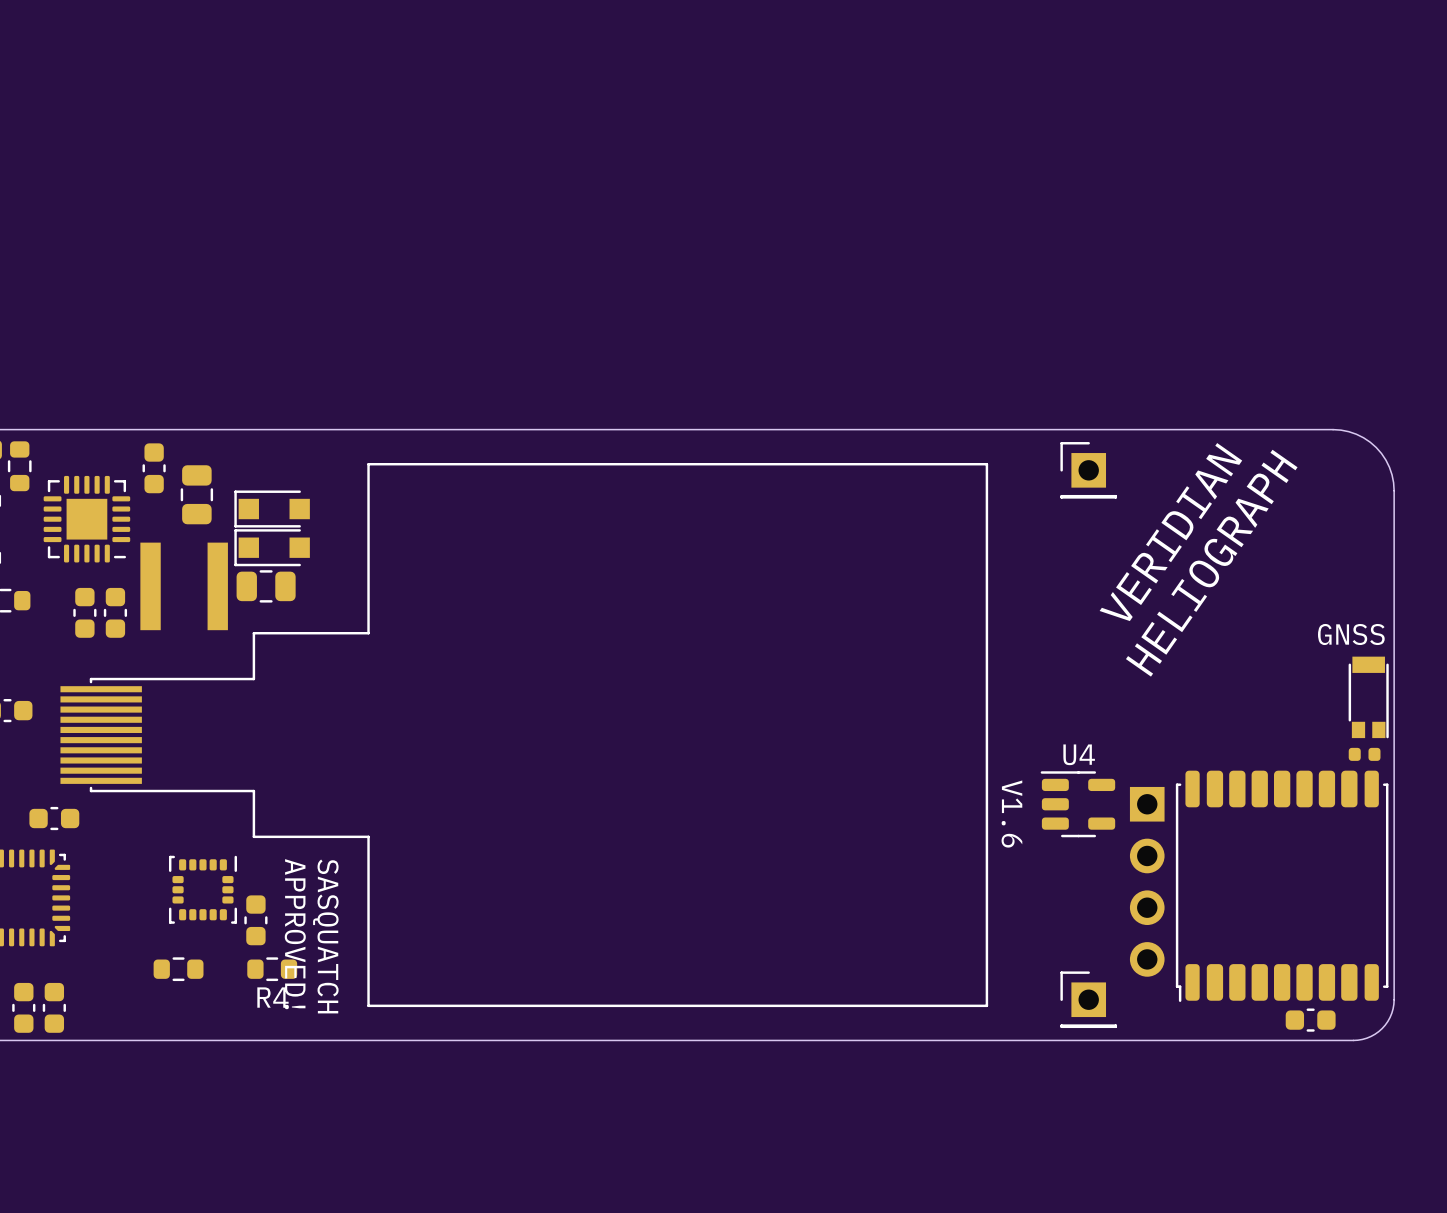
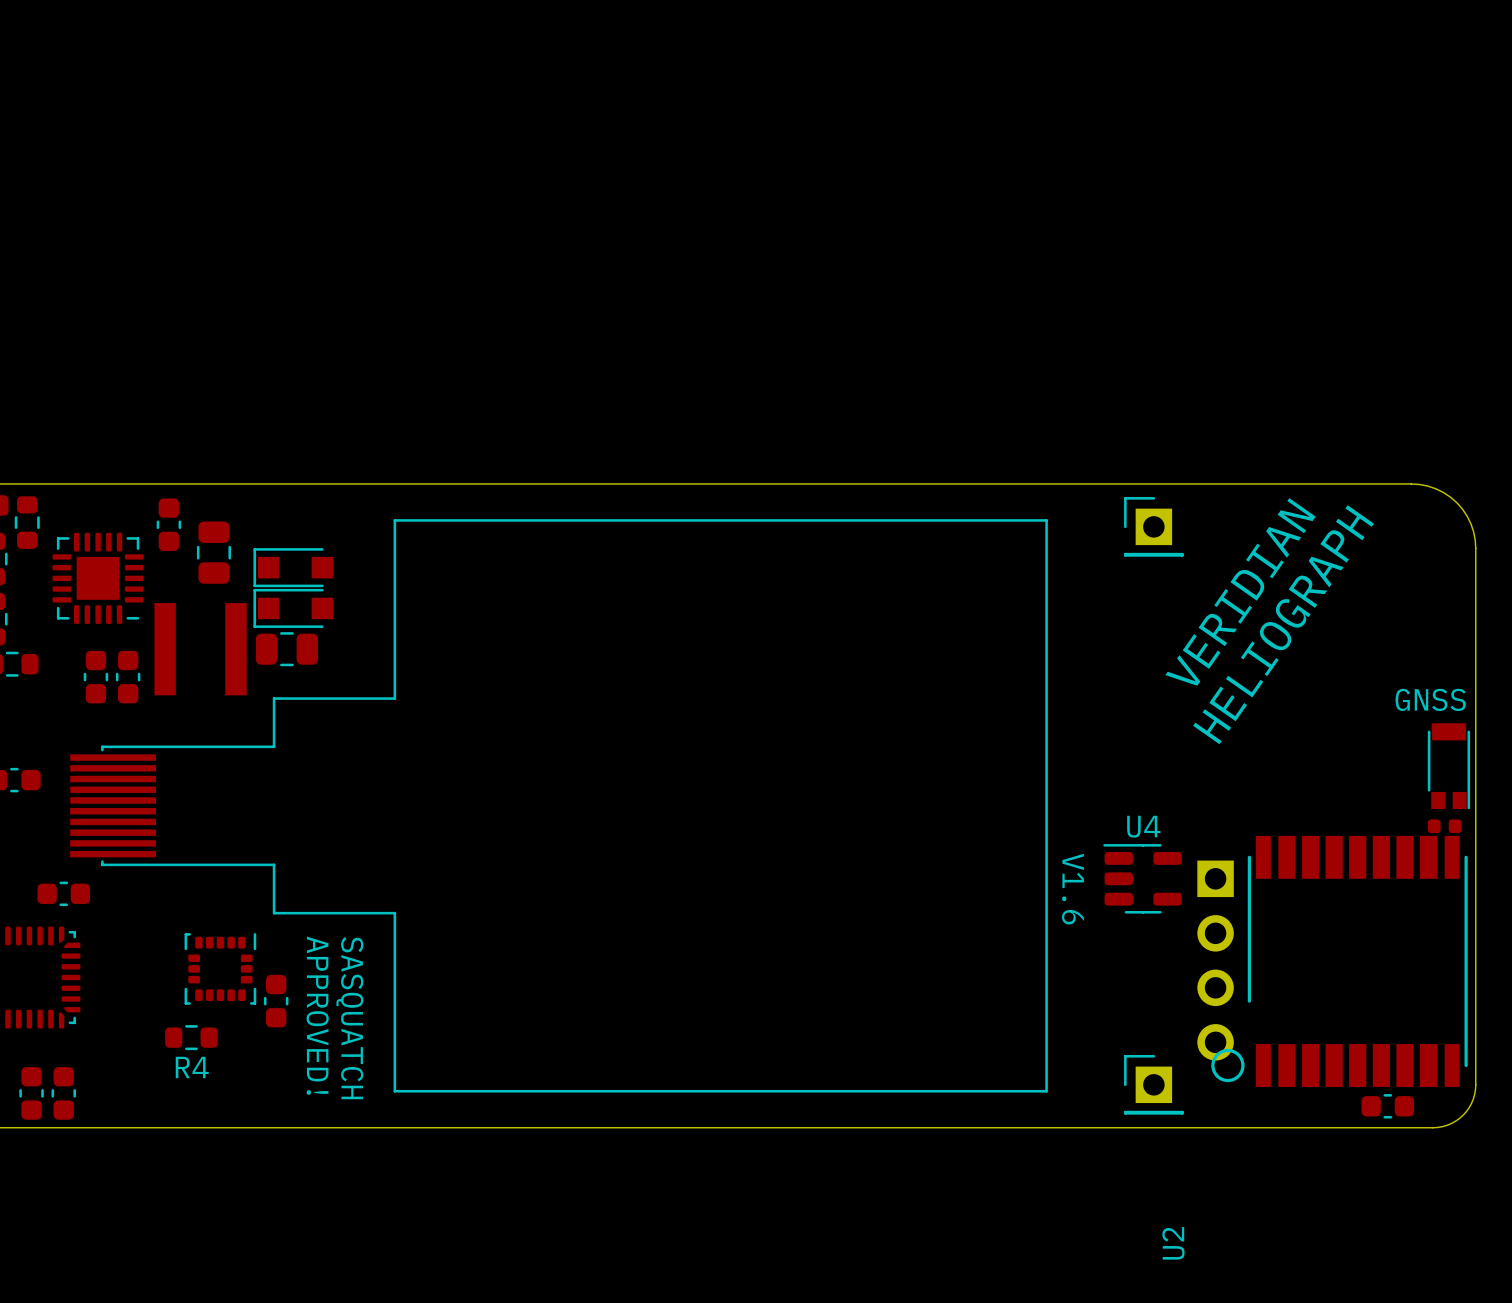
U2: none -> (1339, 961)
part: (1282, 886) -> none
part: (178, 969) -> none
R4 position: (272, 969) -> (191, 1037)

